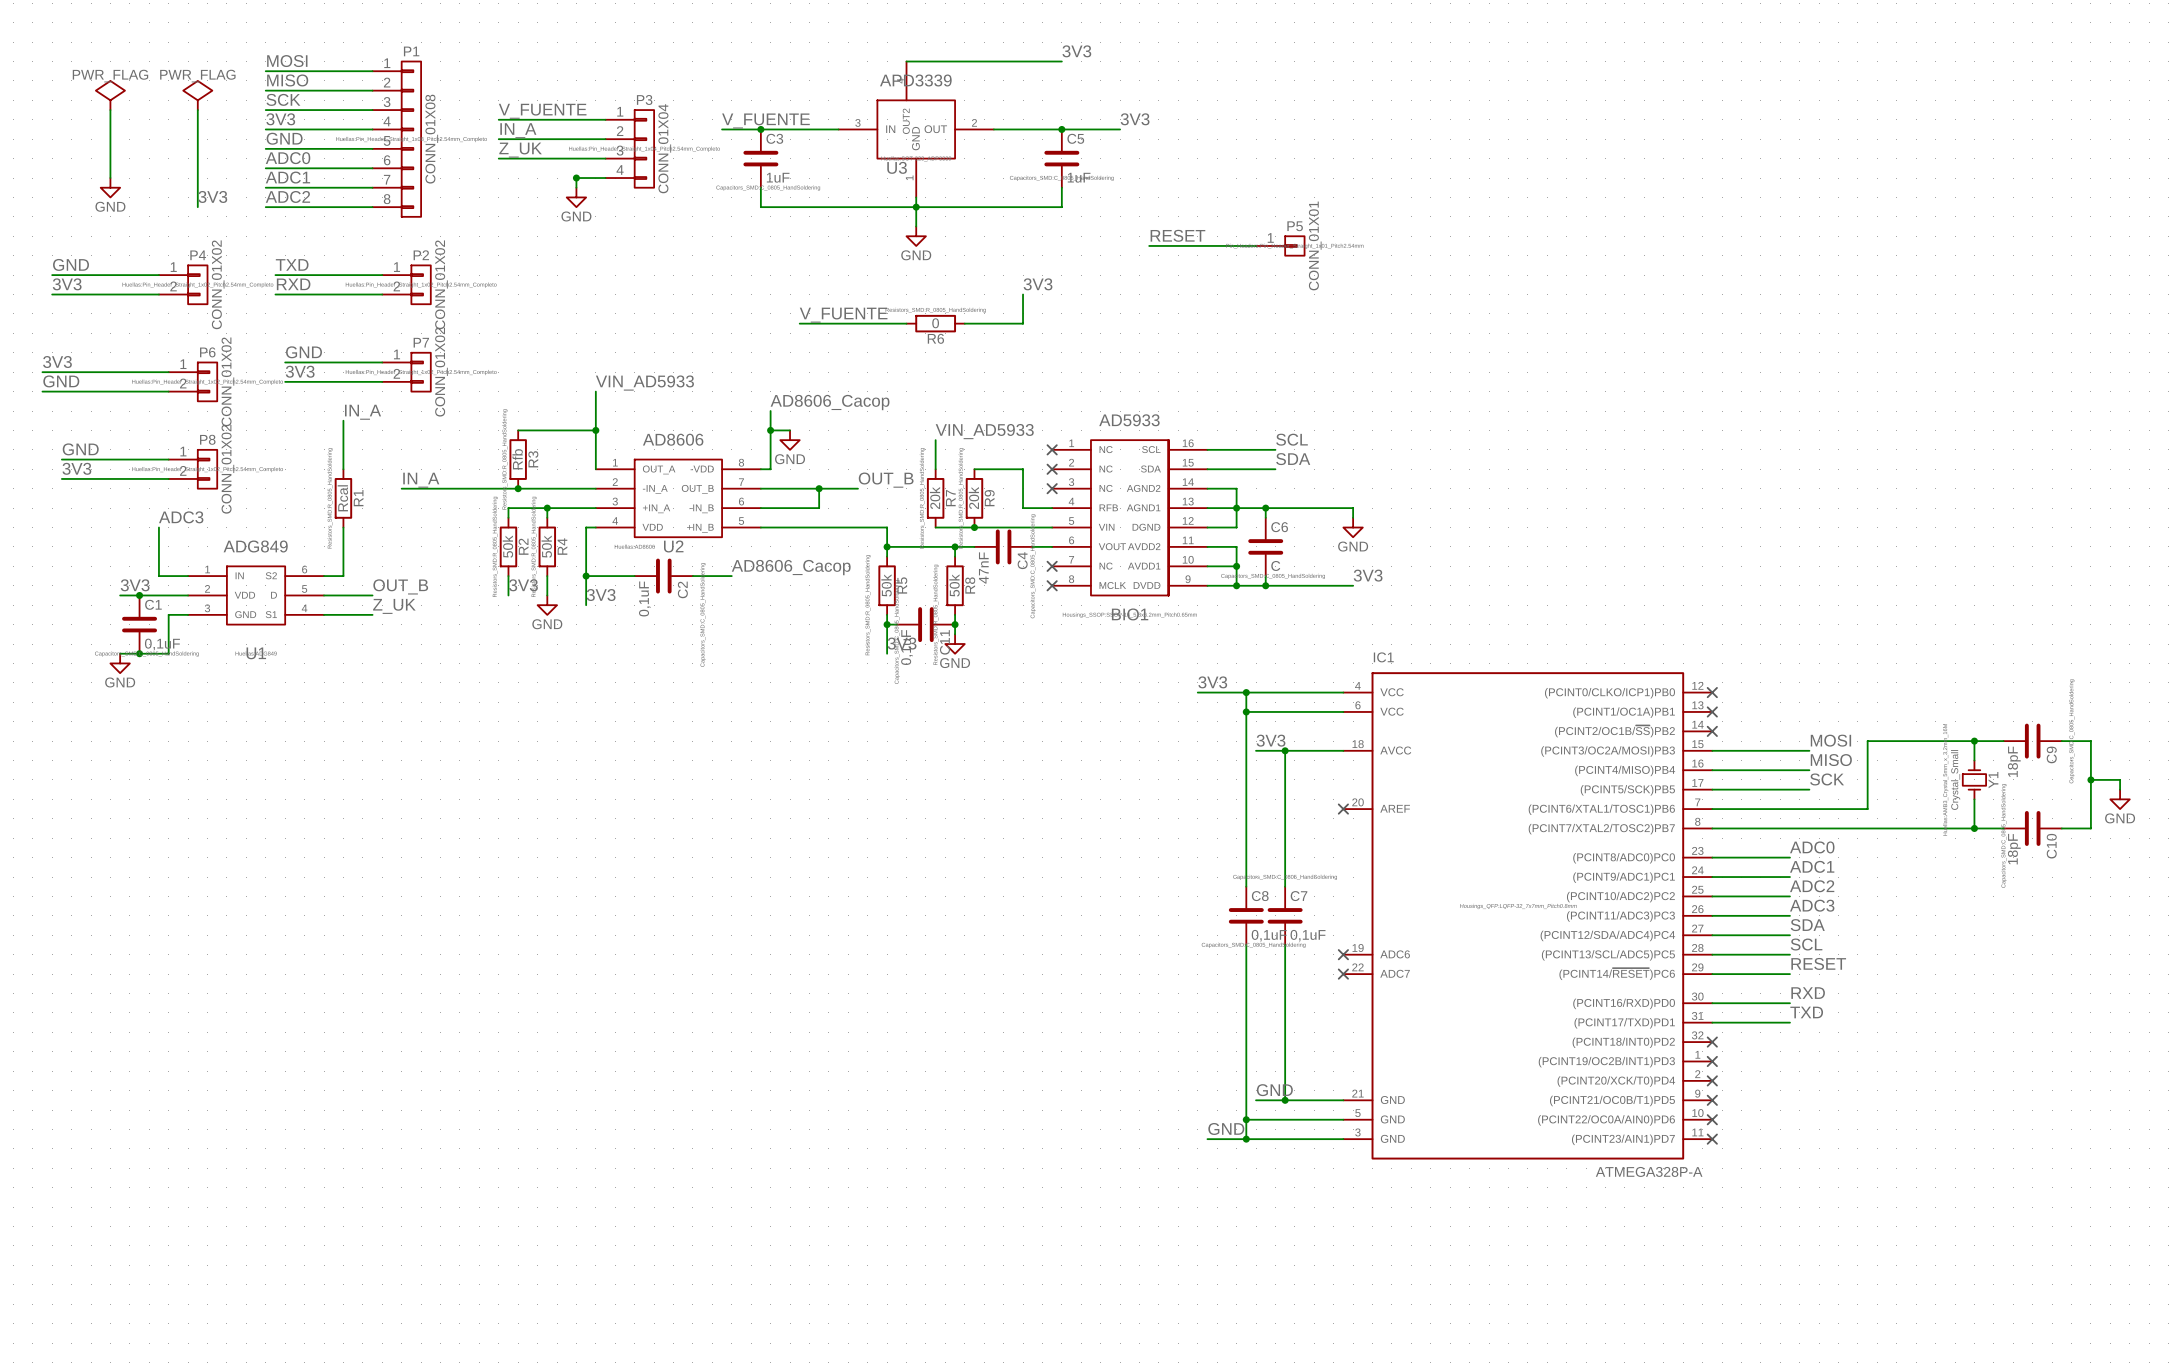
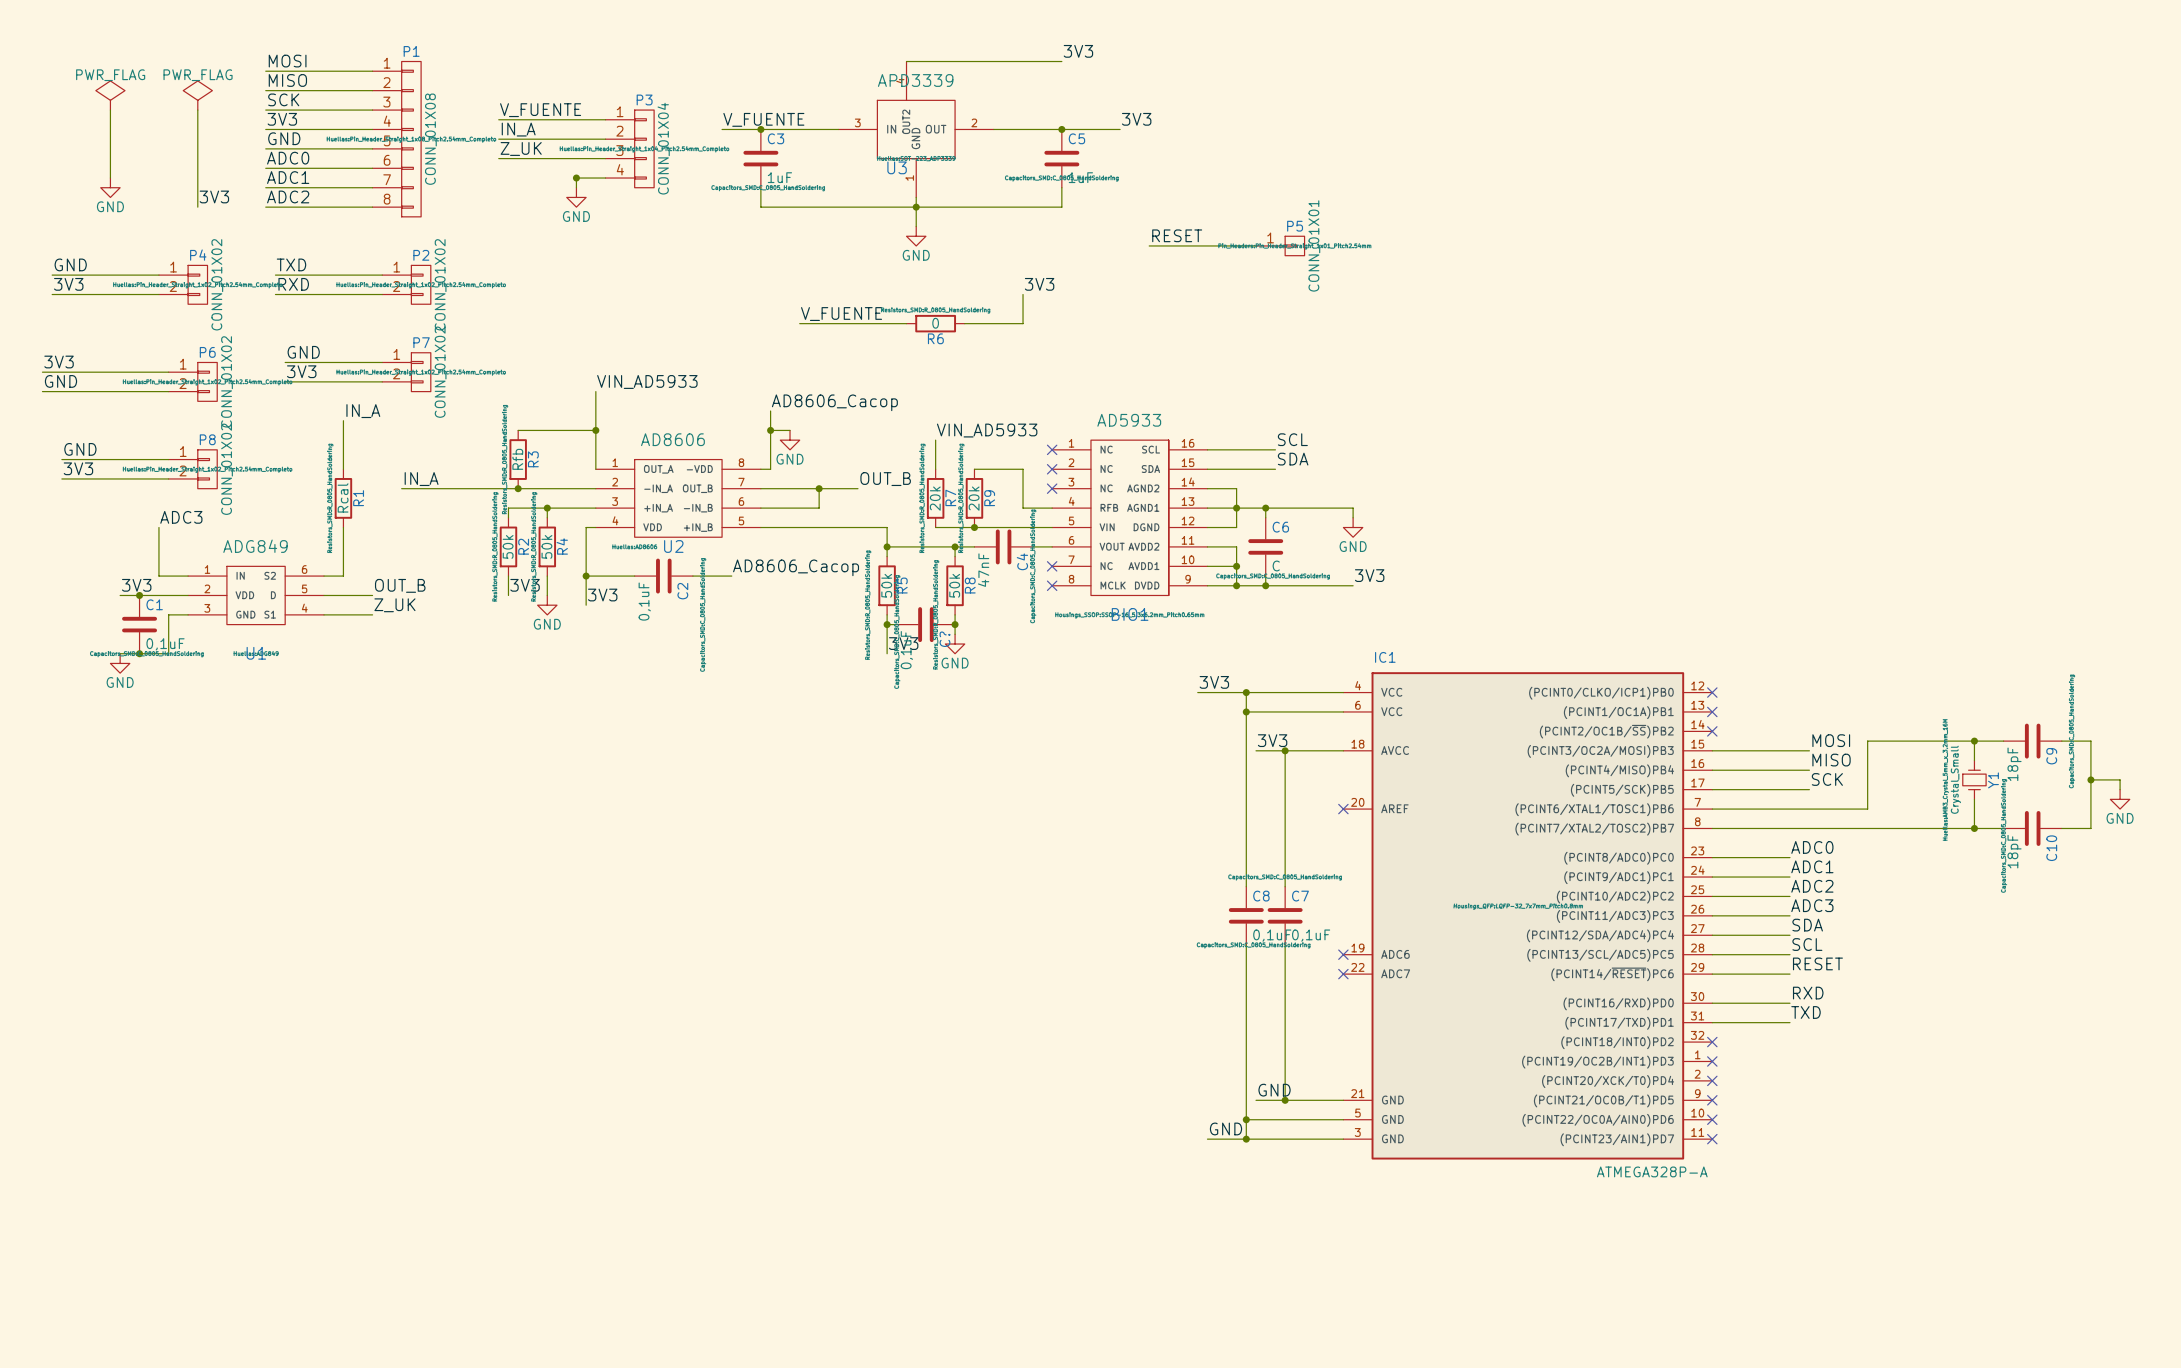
C11 name: C11 (944, 642) -> C? (944, 639)

